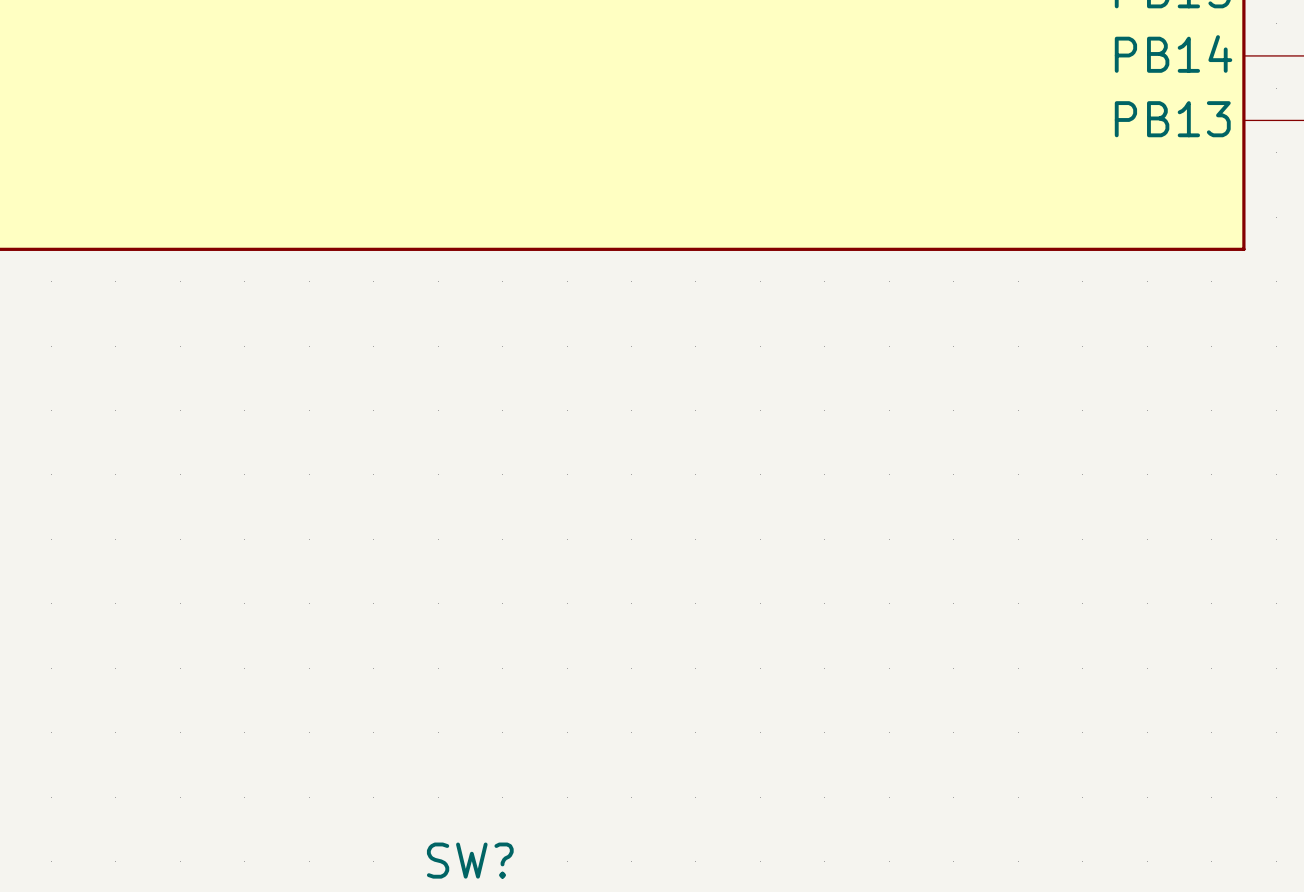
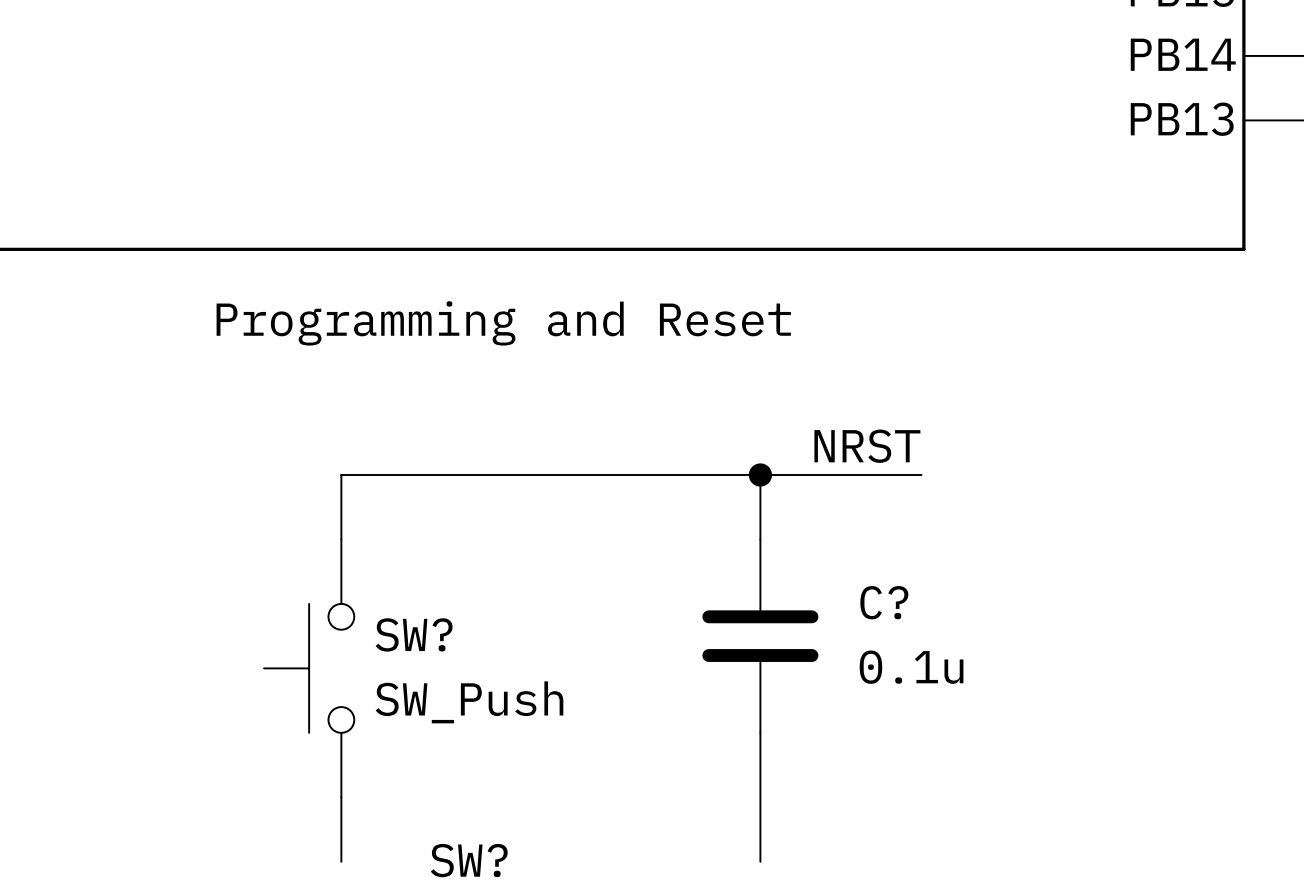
text: none -> Programming and Reset (503, 323)
label: none -> NRST (867, 446)
wire: none -> (760, 474) (760, 539)
junction: none -> (760, 474)
wire: none -> (921, 474) (341, 474) (341, 539)
C?: none -> 0.1u (760, 636)
SW?: none -> SW_Push (309, 668)
wire: none -> (760, 732) (760, 861)
wire: none -> (341, 797) (341, 861)

